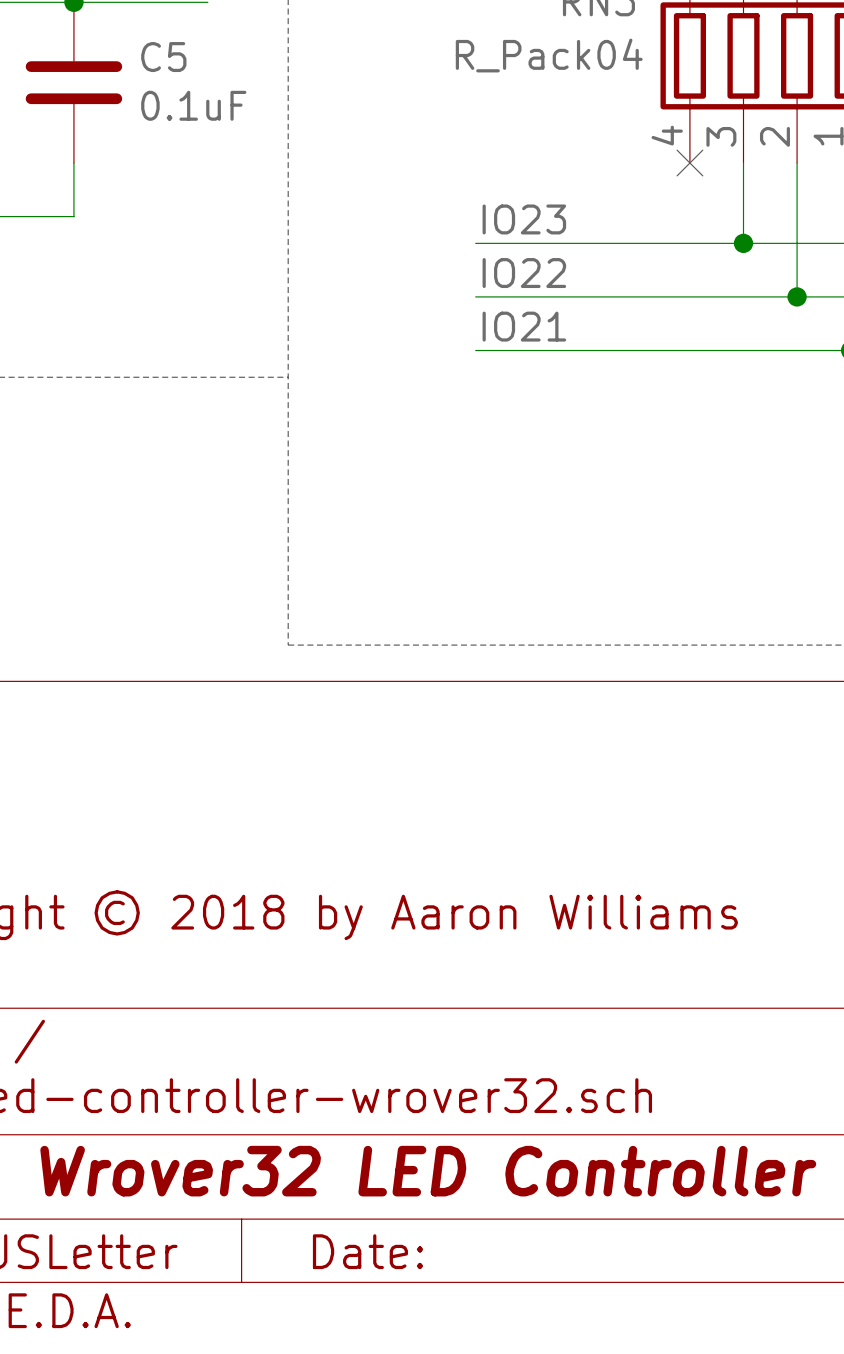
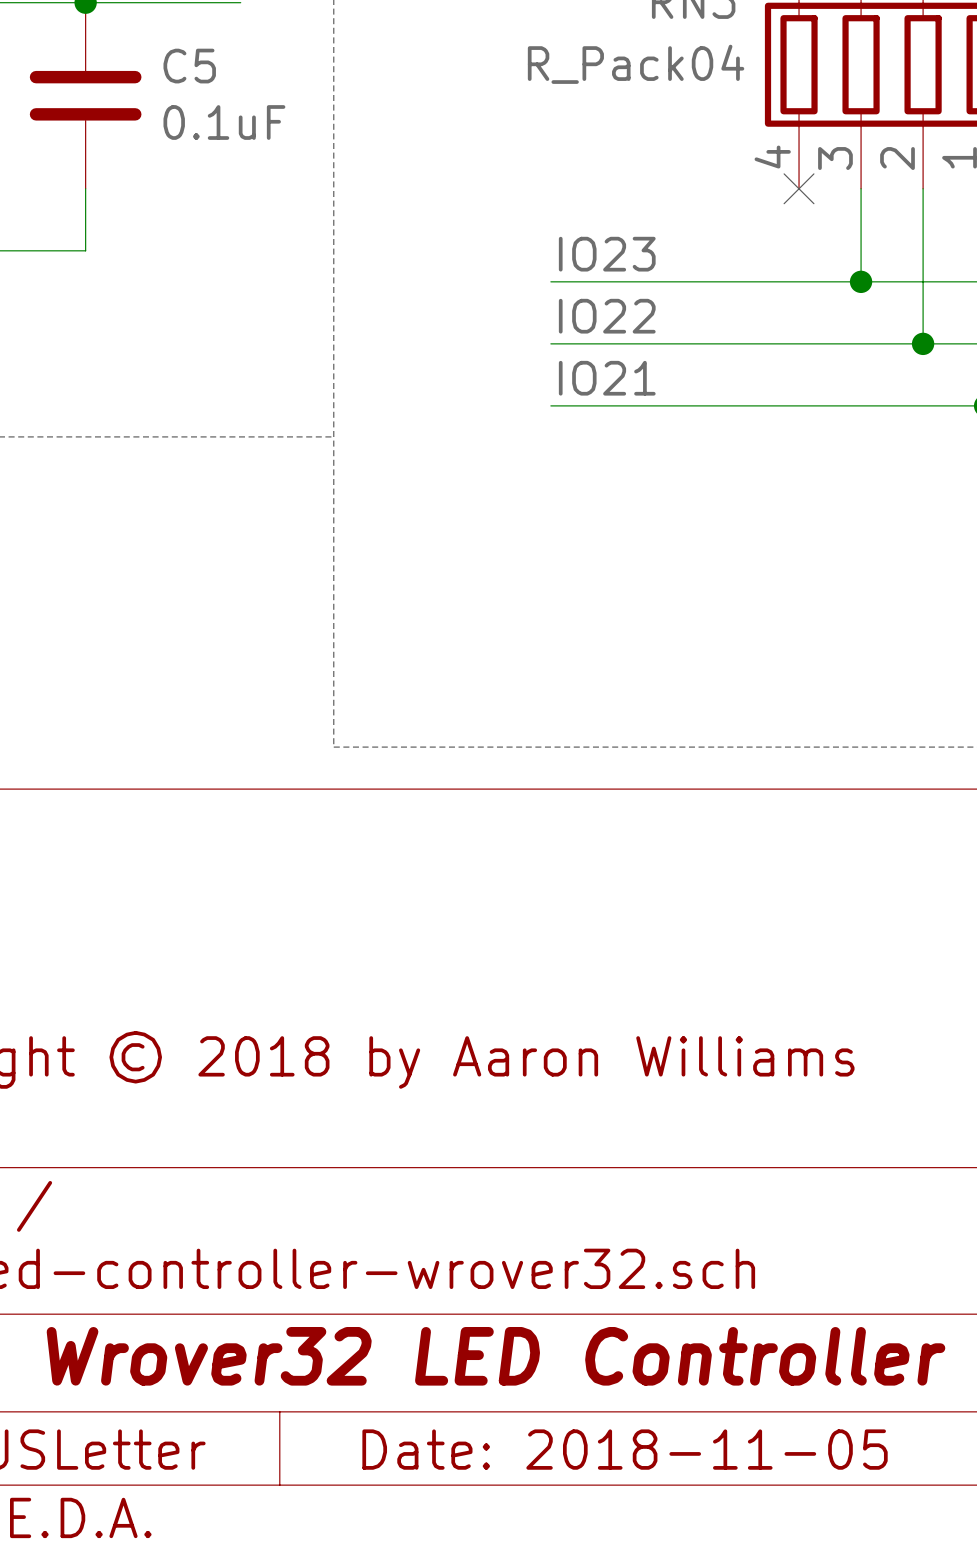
title block: Date: (367, 1251) -> Date: 2018-11-05 (625, 1449)

